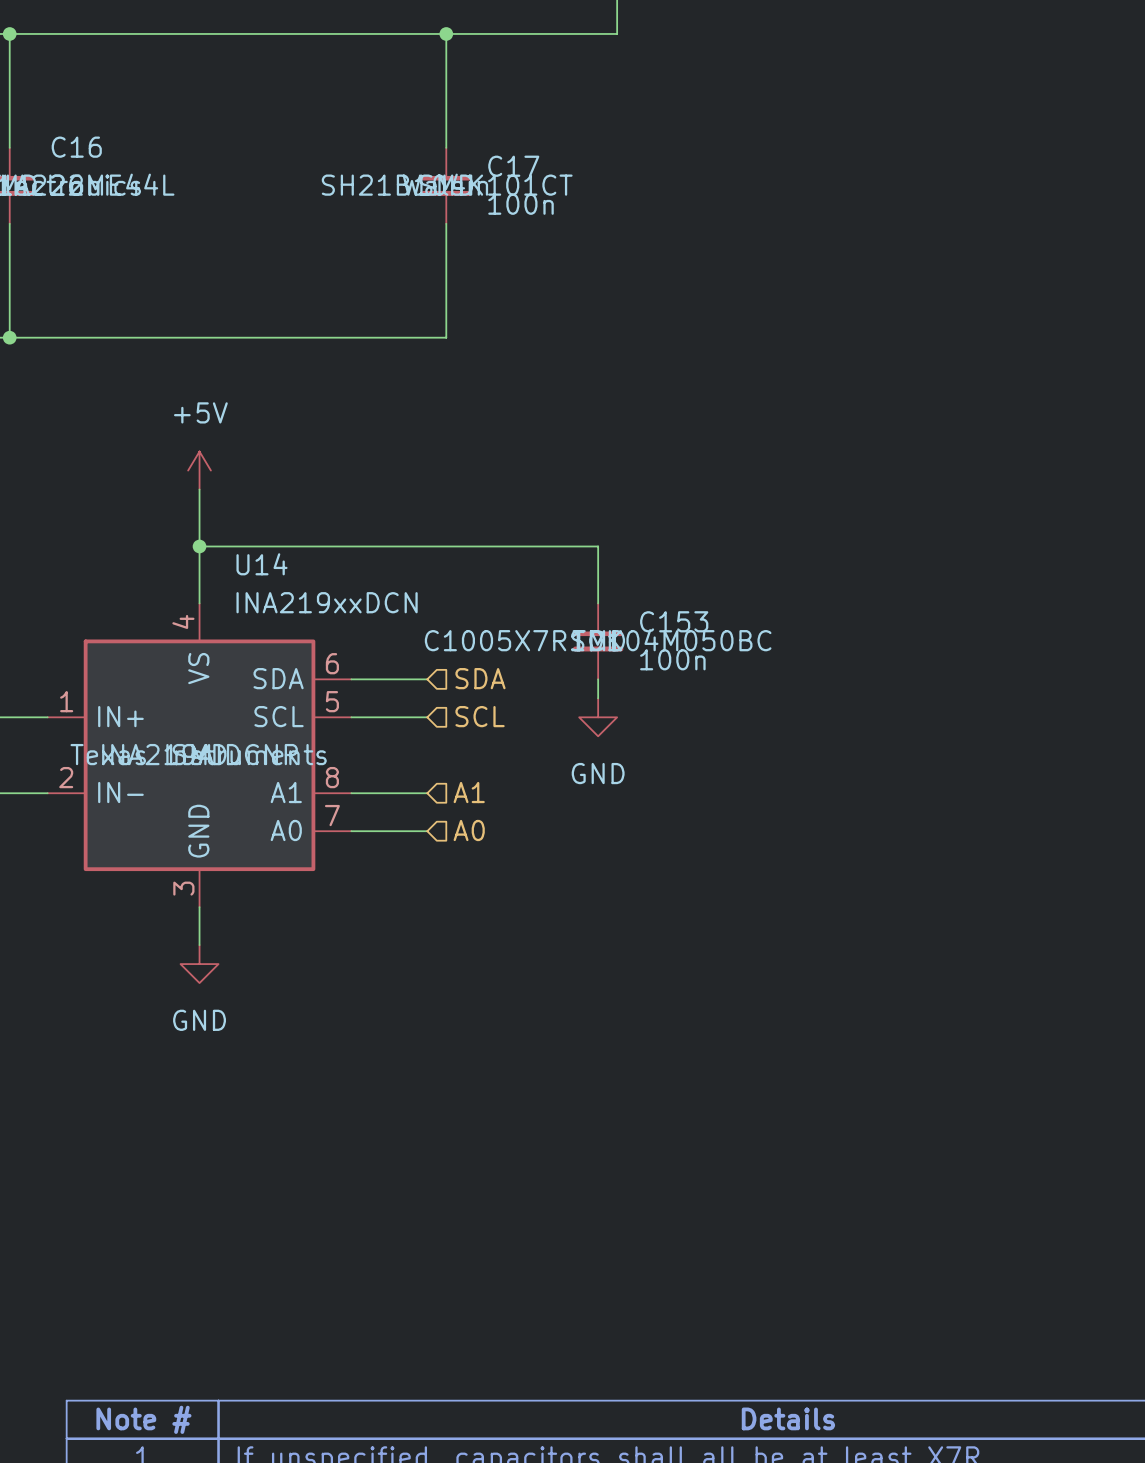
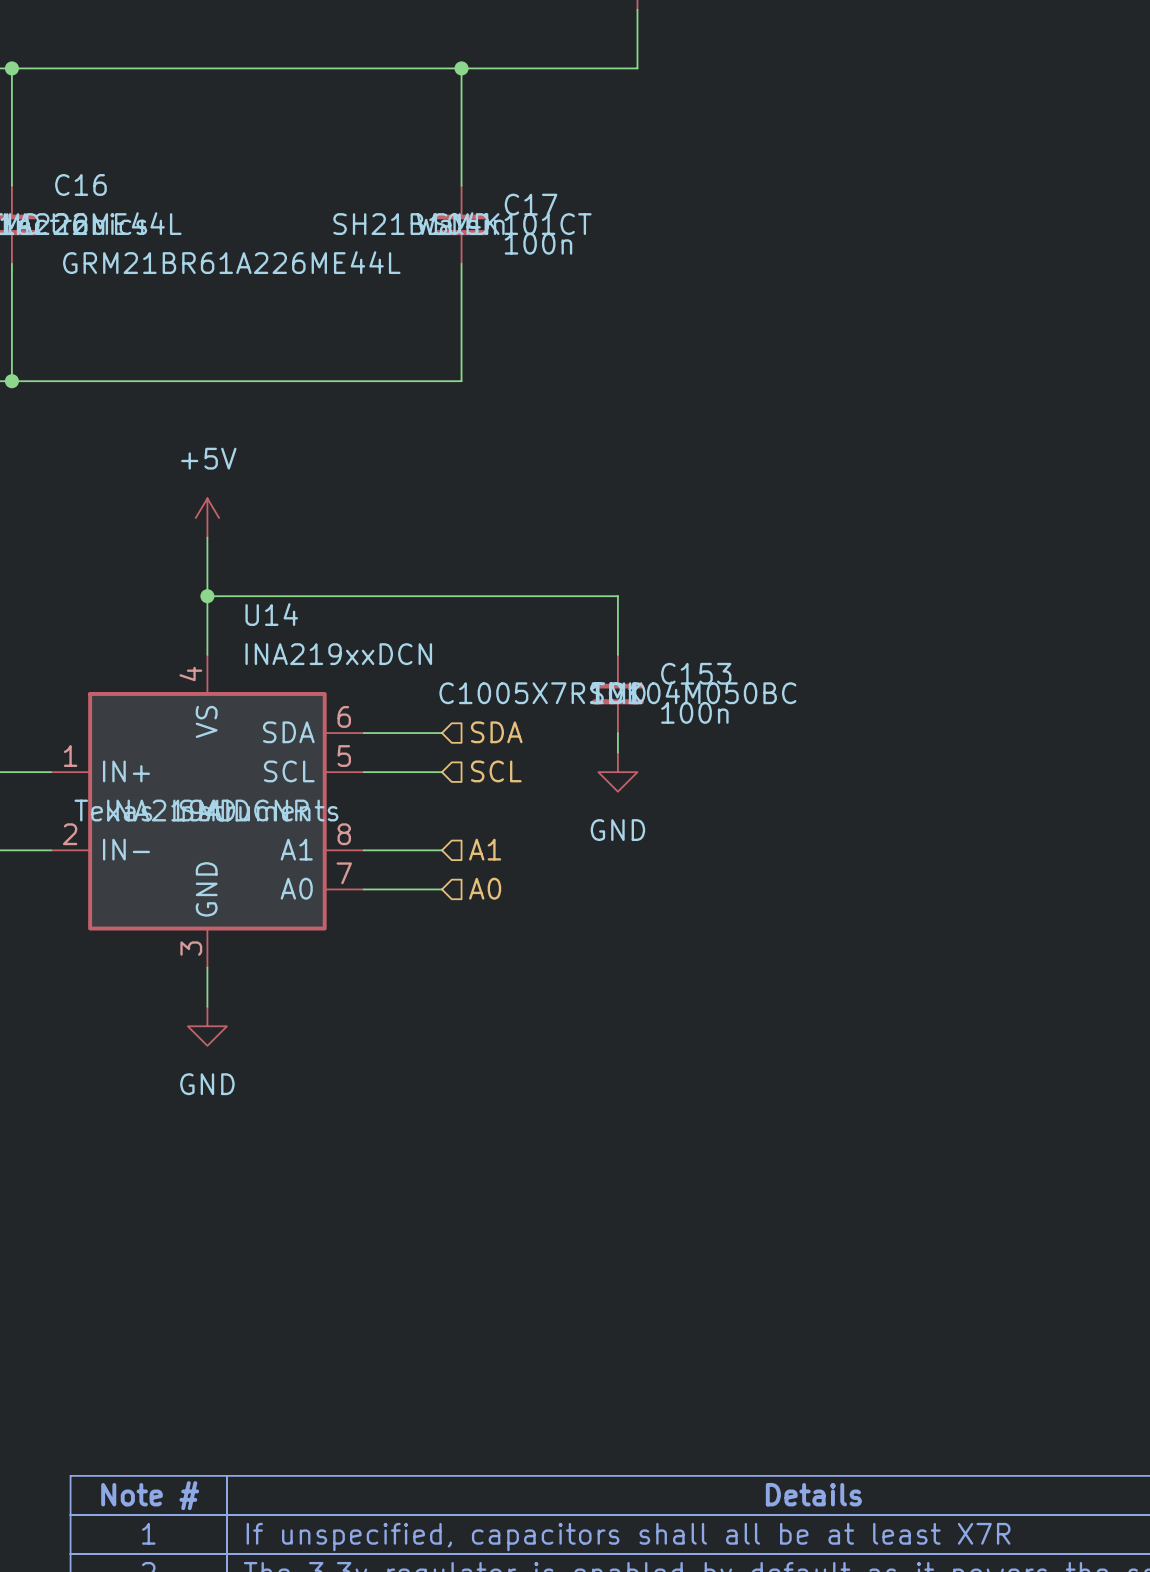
C16 text: none -> GRM21BR61A226ME44L (231, 262)

